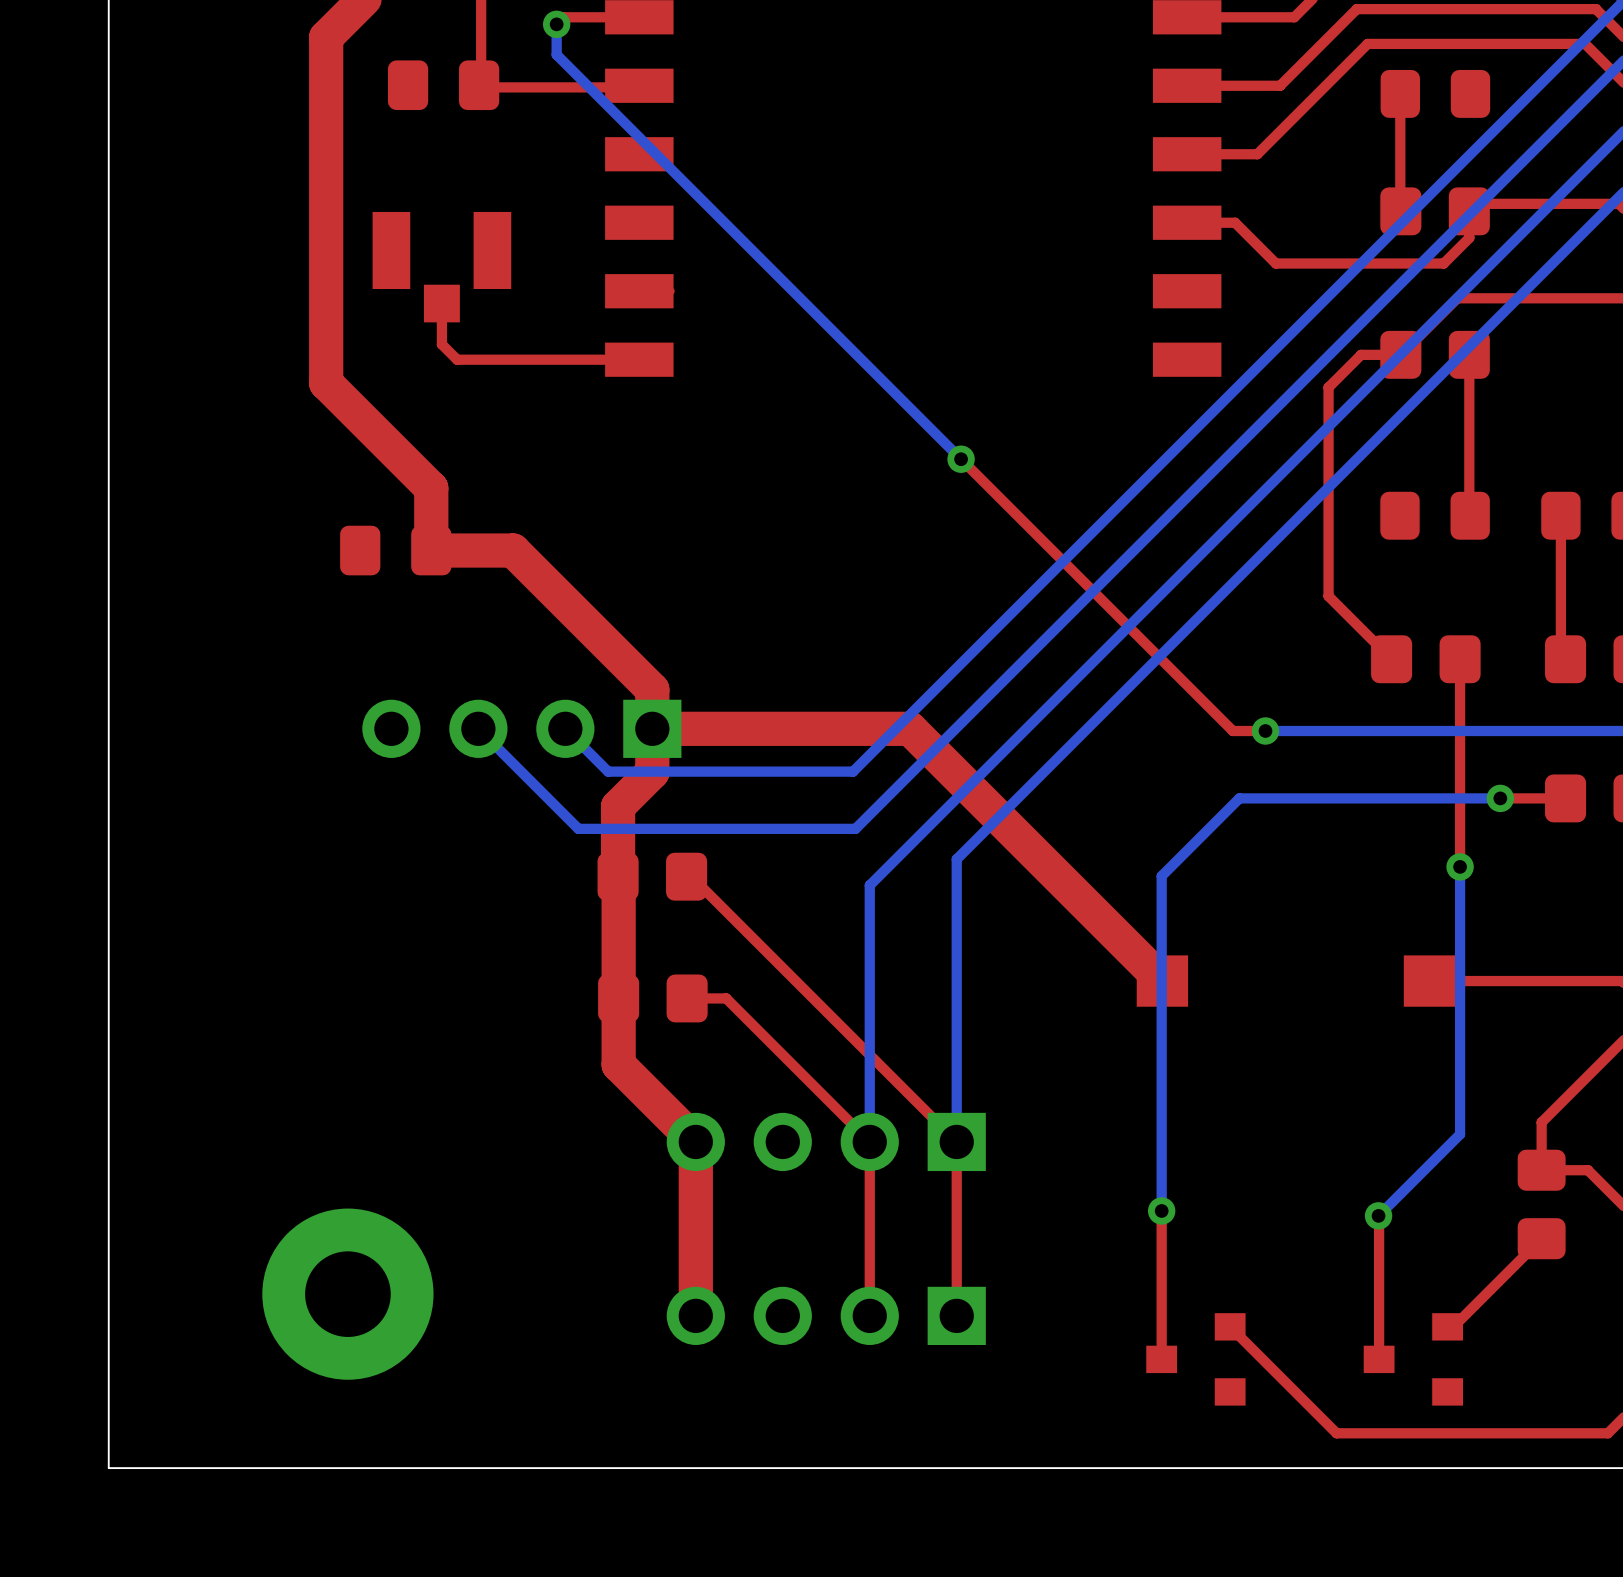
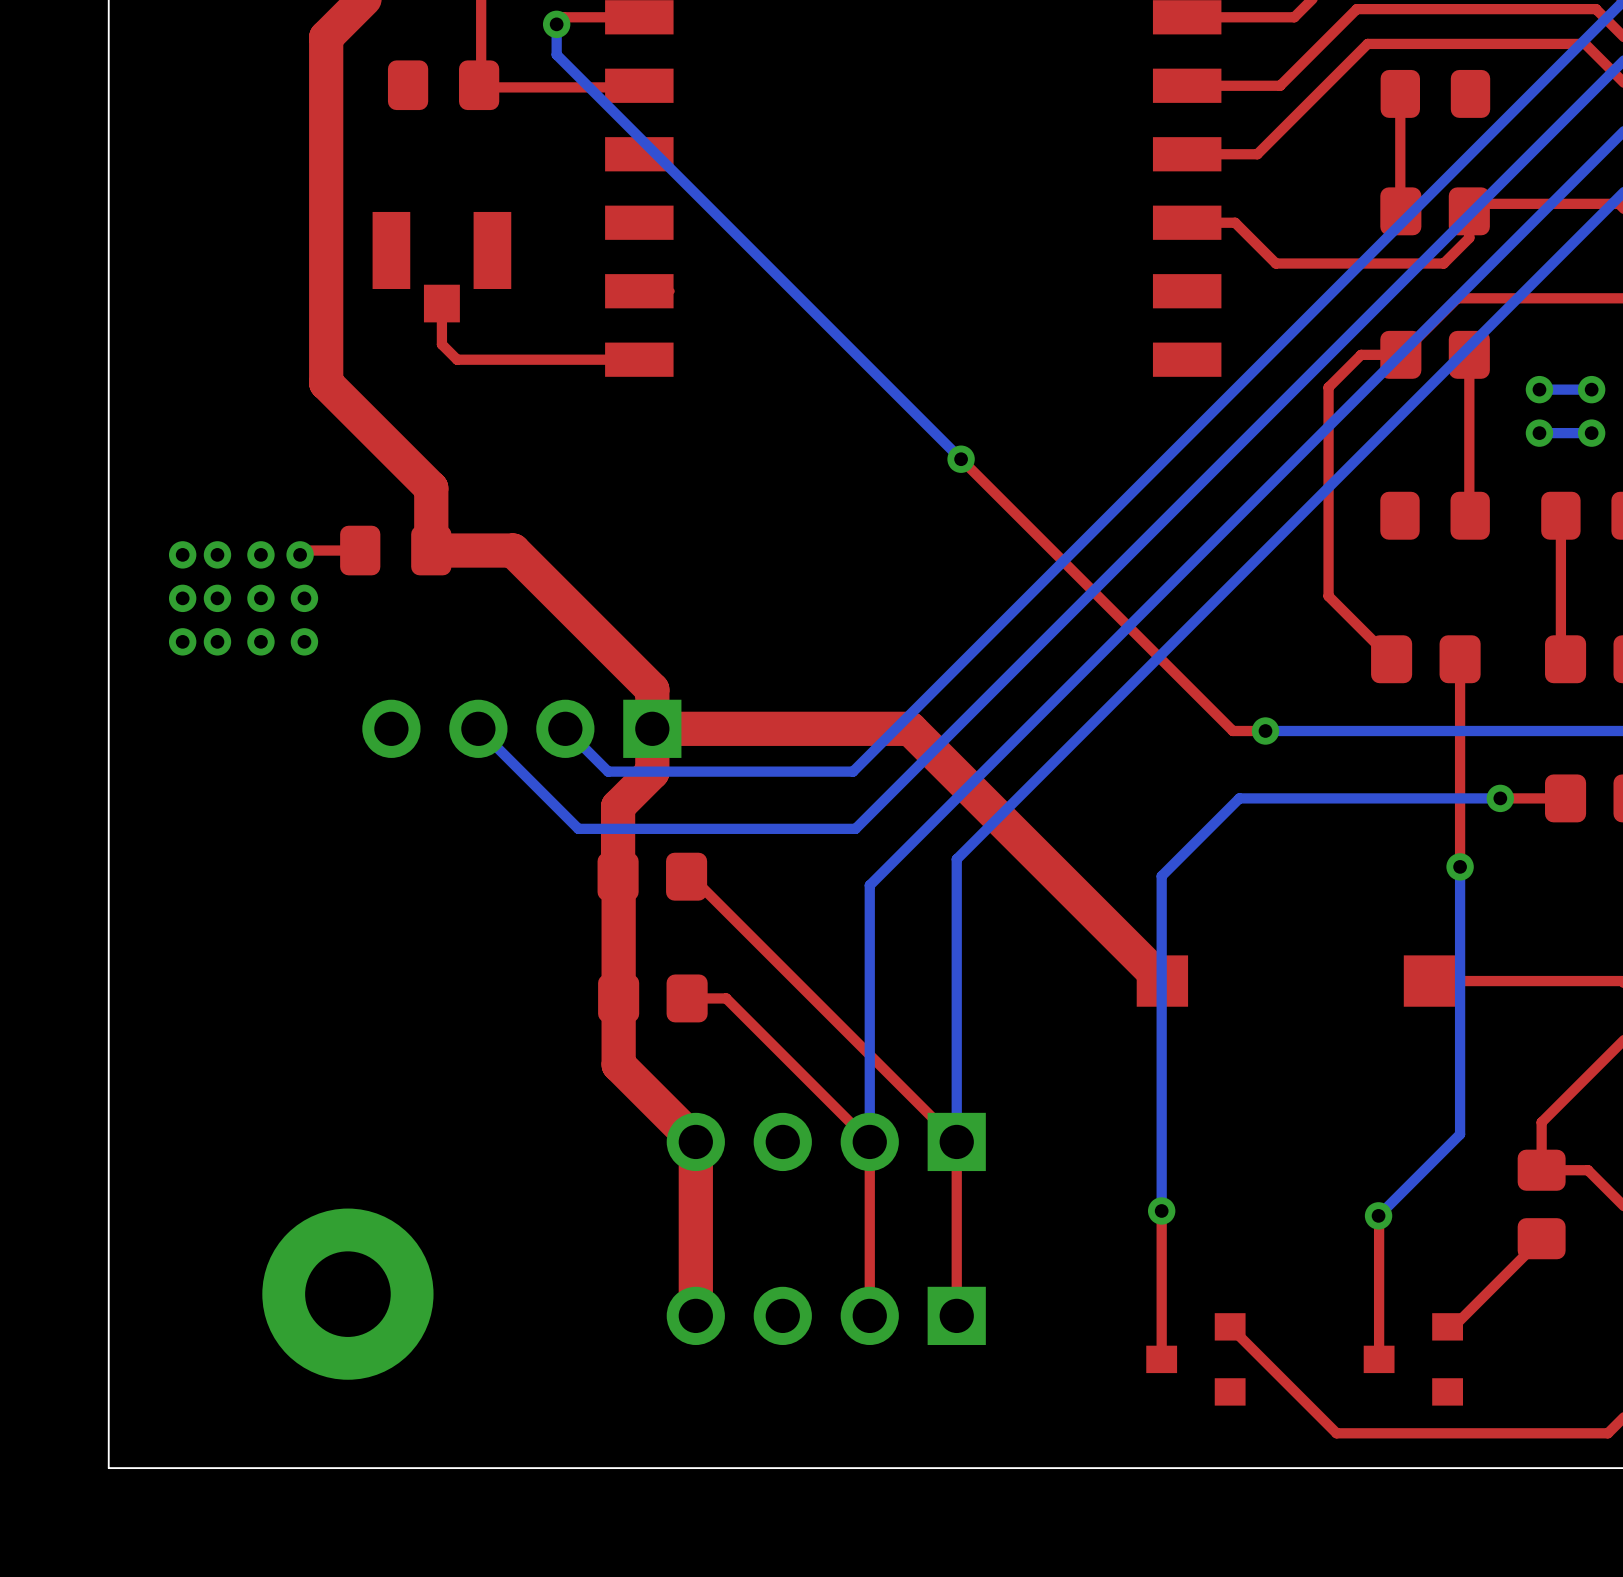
via: none -> (1539, 389)
bottom track: none -> (1591, 389) (1539, 389)
via: none -> (1591, 389)
via: none -> (1539, 433)
bottom track: none -> (1591, 433) (1539, 433)
via: none -> (1591, 433)
top track: none -> (360, 550) (304, 550) (300, 554)
via: none -> (182, 554)
via: none -> (217, 554)
via: none -> (260, 554)
via: none -> (300, 554)
via: none -> (182, 598)
via: none -> (217, 598)
via: none -> (260, 598)
via: none -> (304, 598)
via: none -> (182, 641)
via: none -> (217, 641)
via: none -> (260, 641)
via: none -> (304, 641)

